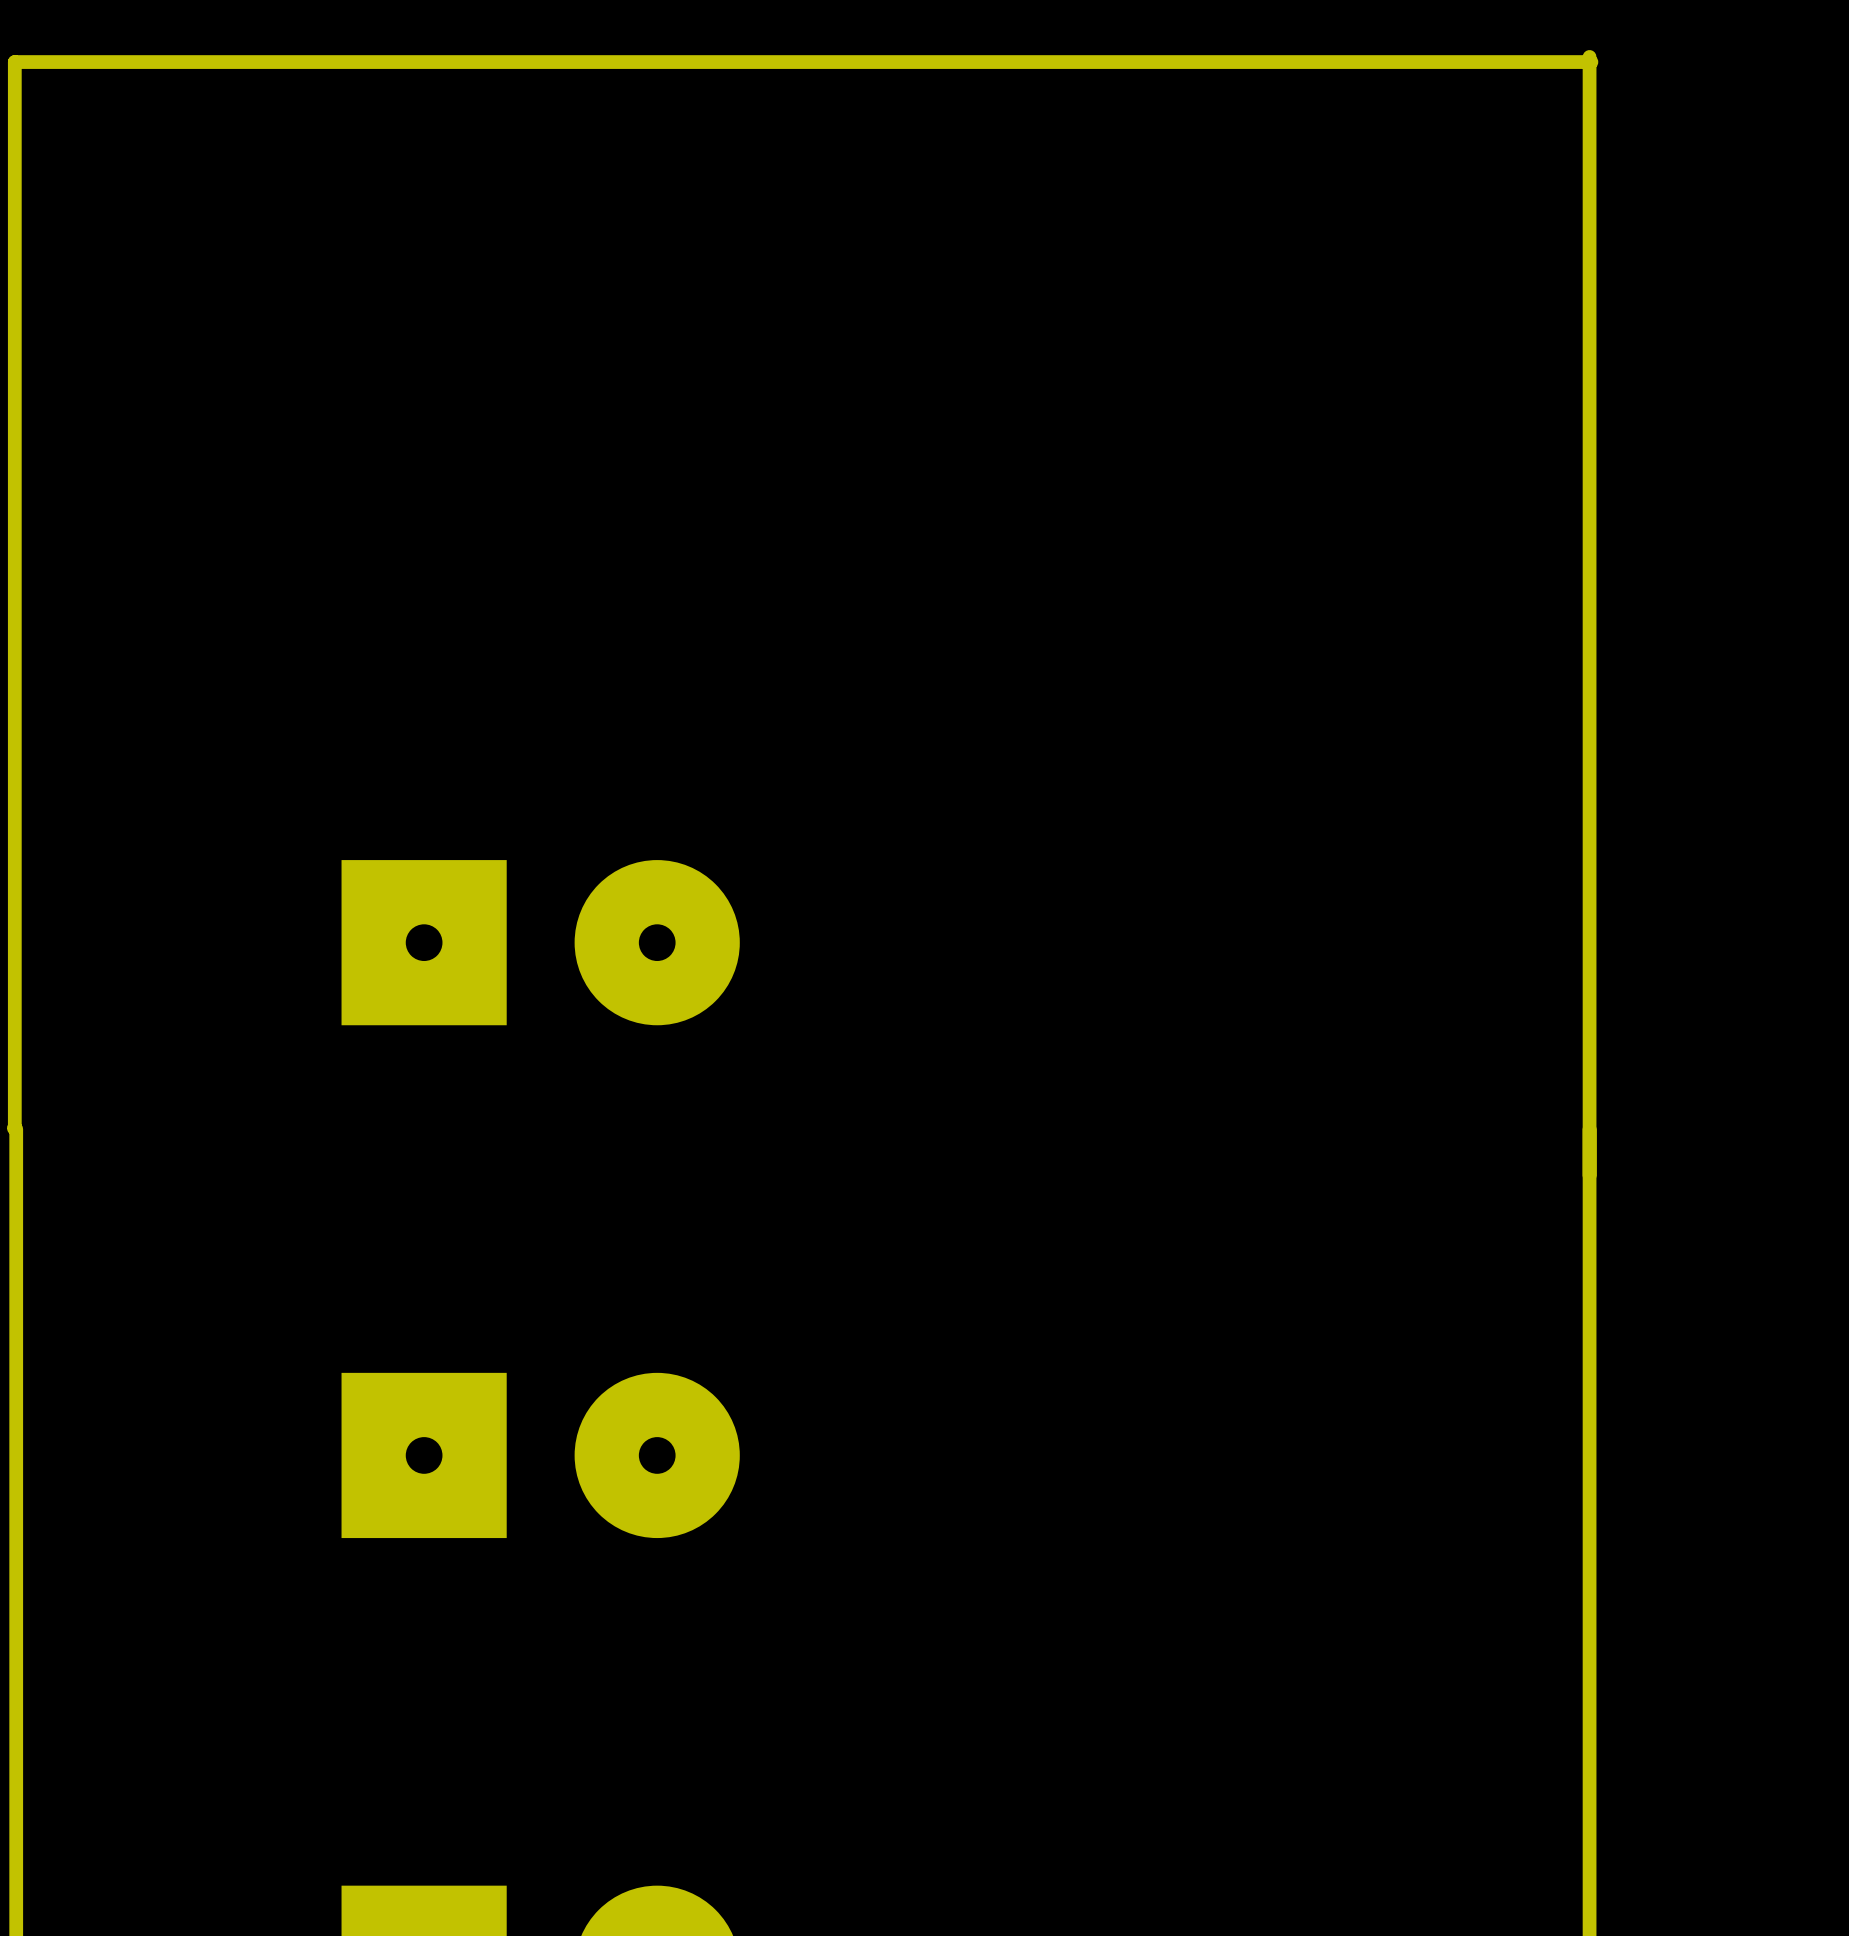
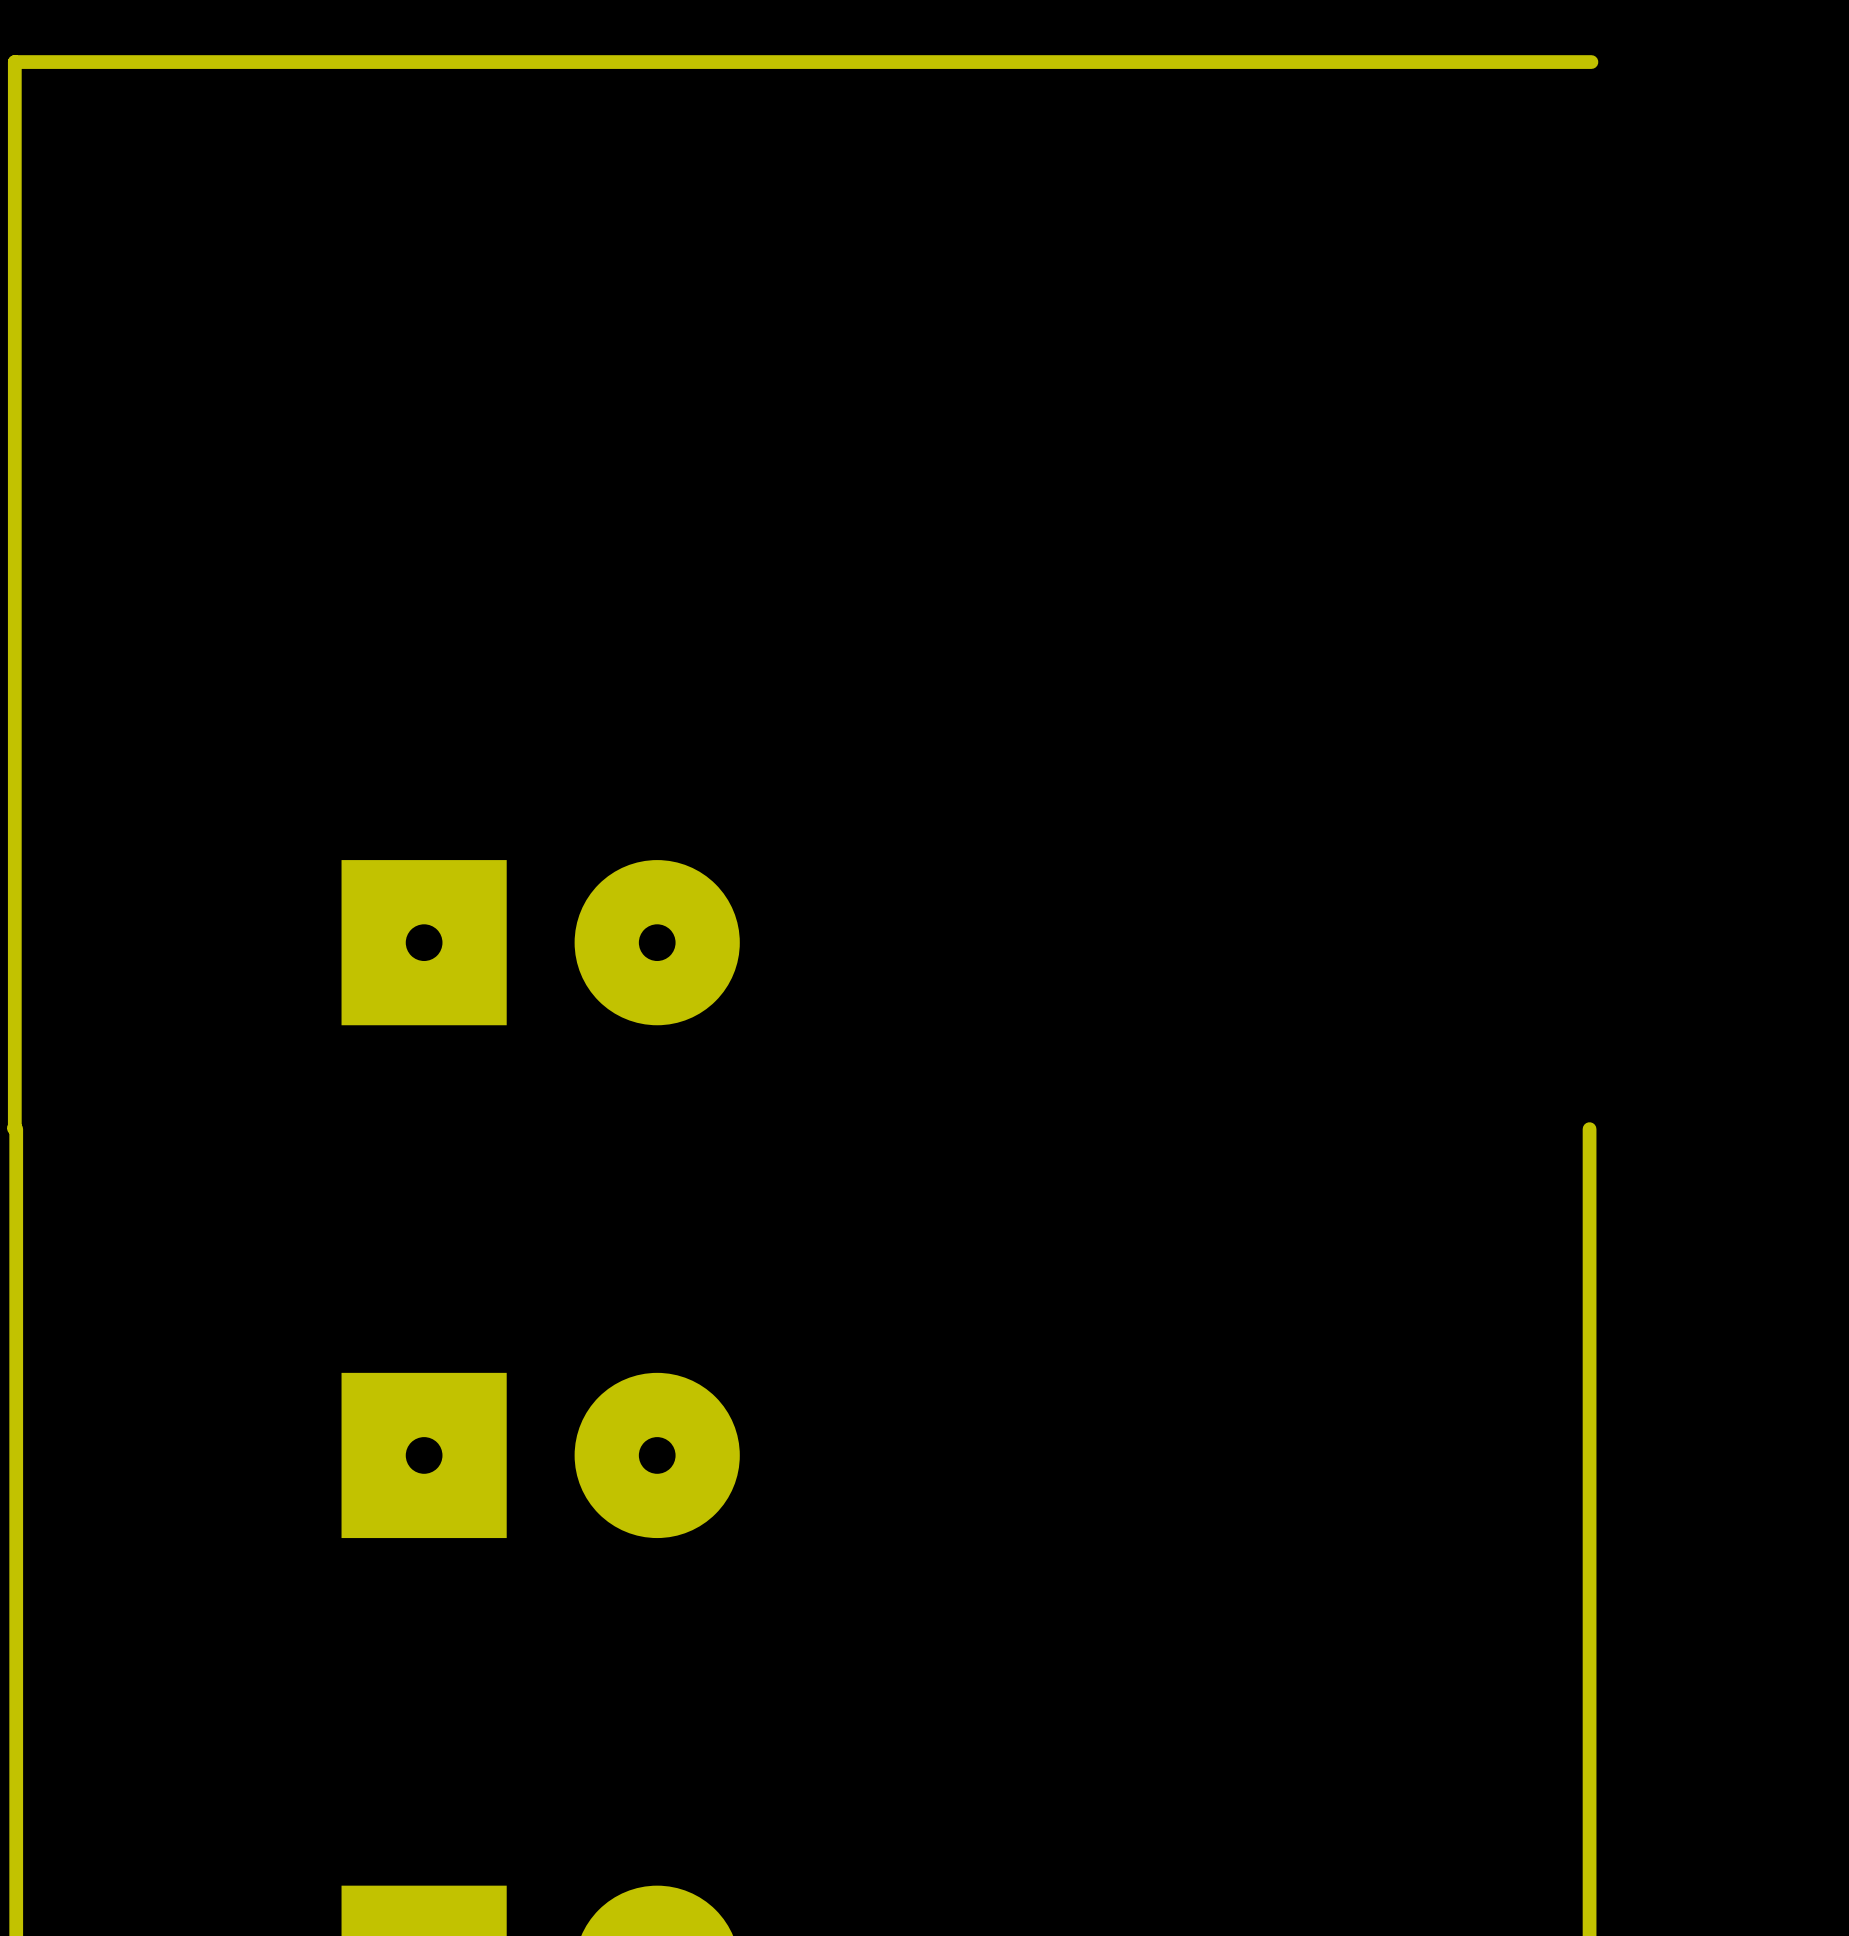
board edge: (1589, 56) (1589, 1129) -> none

